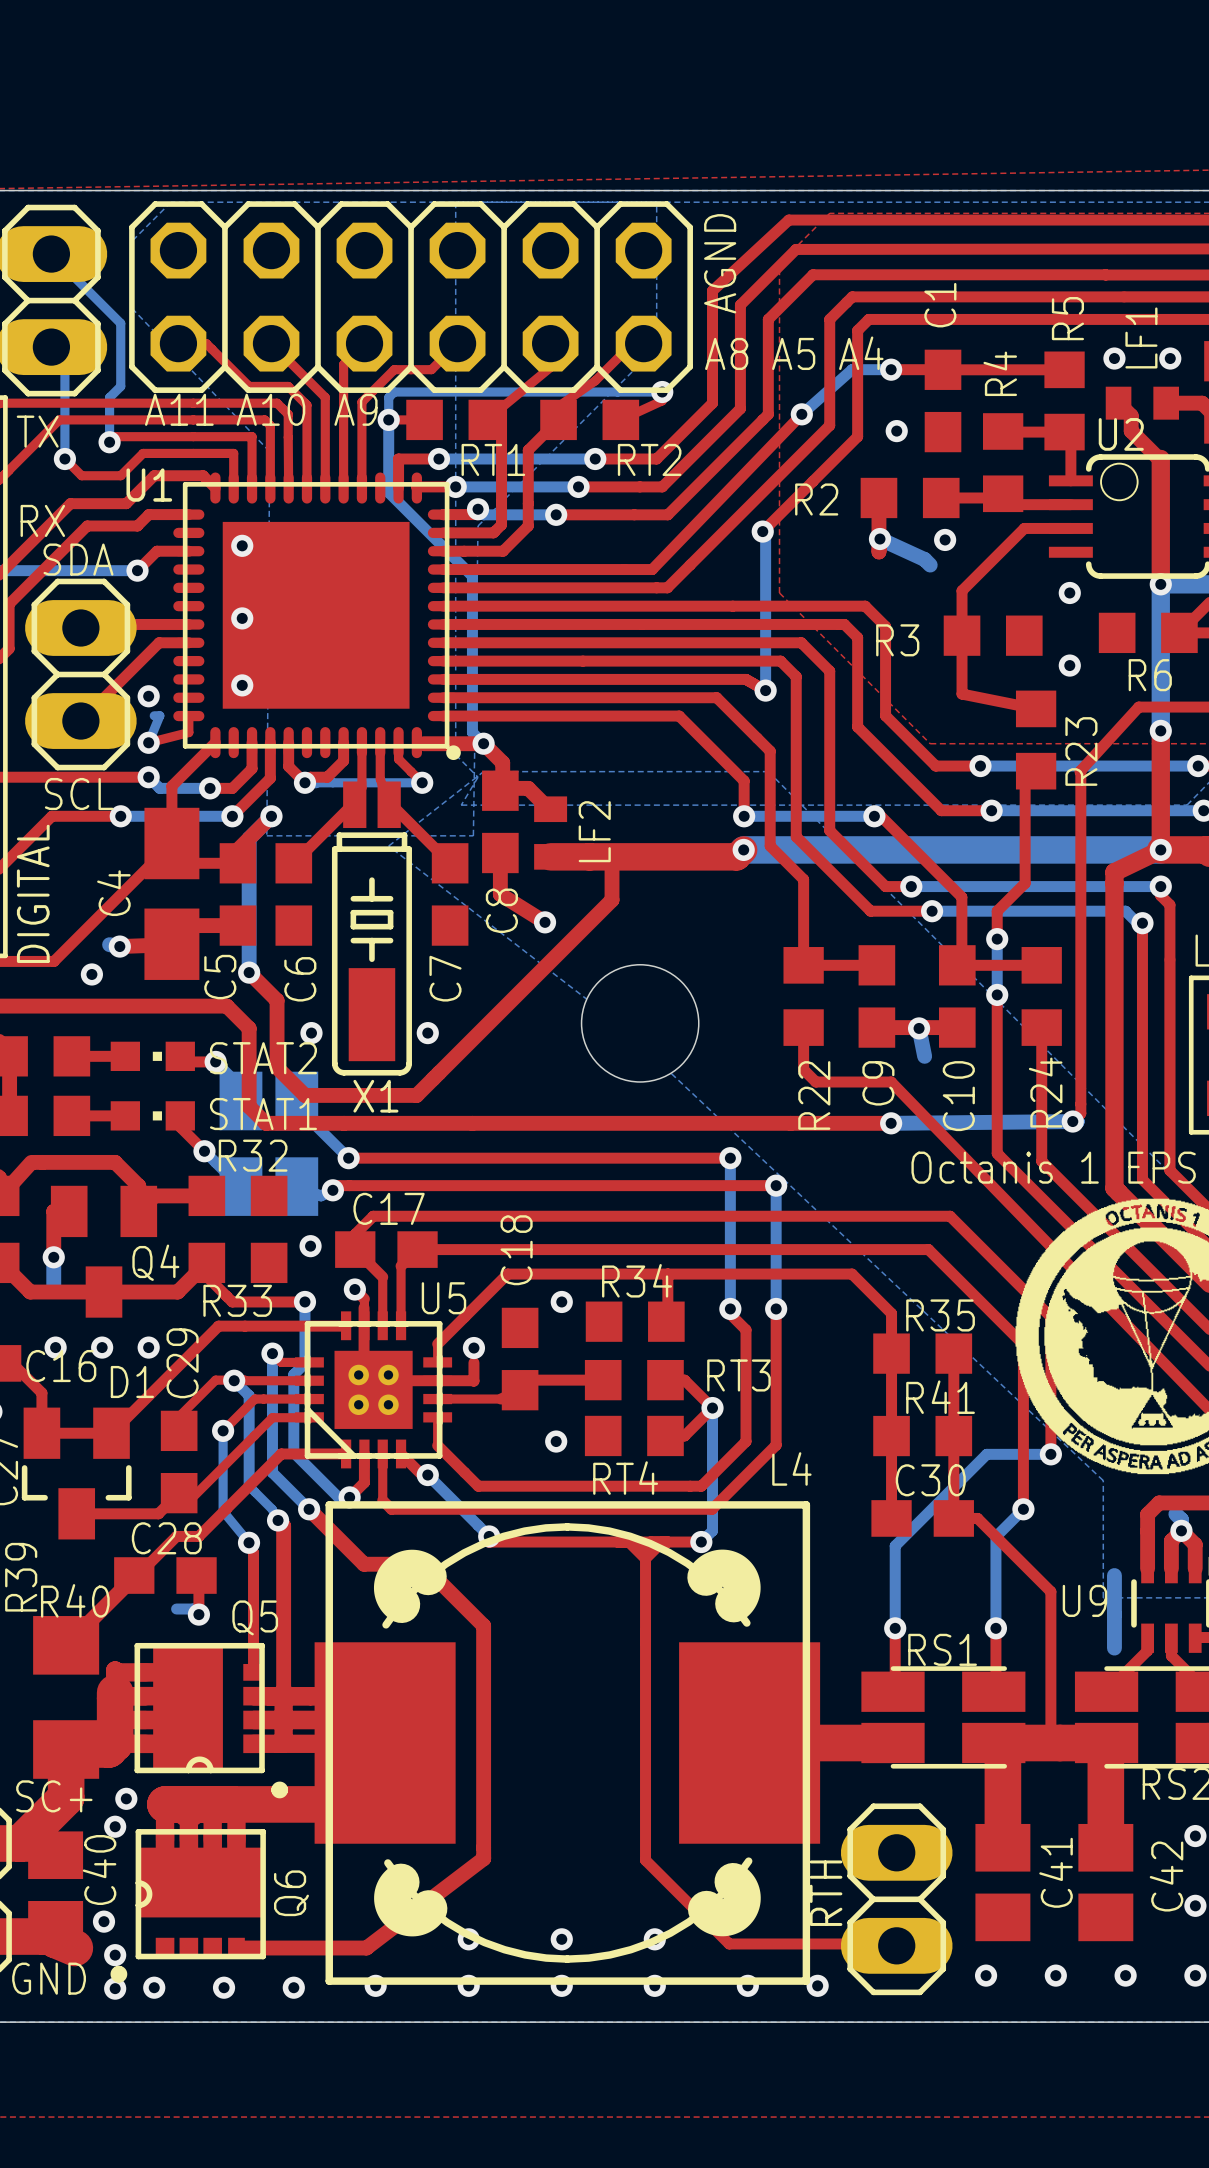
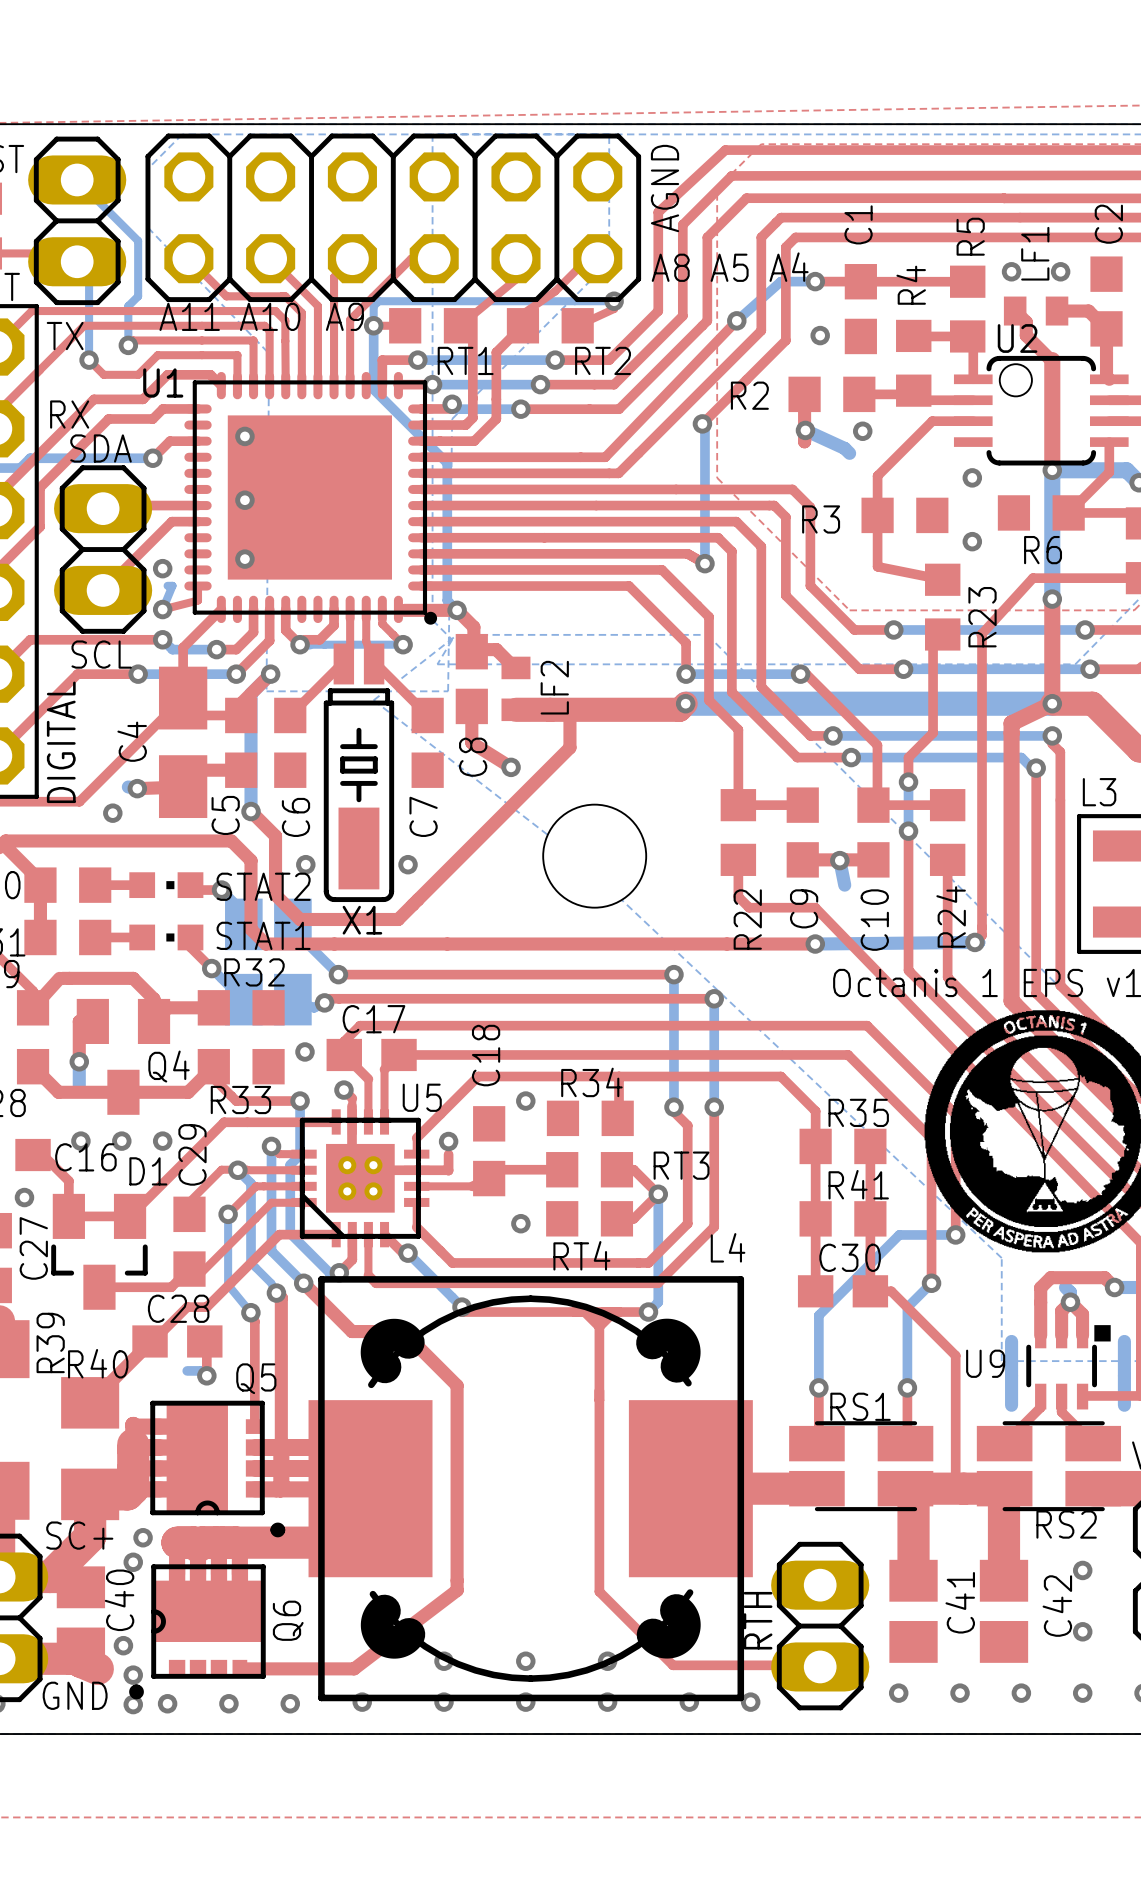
top track: (178, 343) (206, 343) (249, 386) -> (188, 258) (226, 296) (251, 296)
top track: (457, 343) (431, 369) (394, 369) (361, 402) (361, 413) -> (434, 258) (411, 258) (350, 319)

